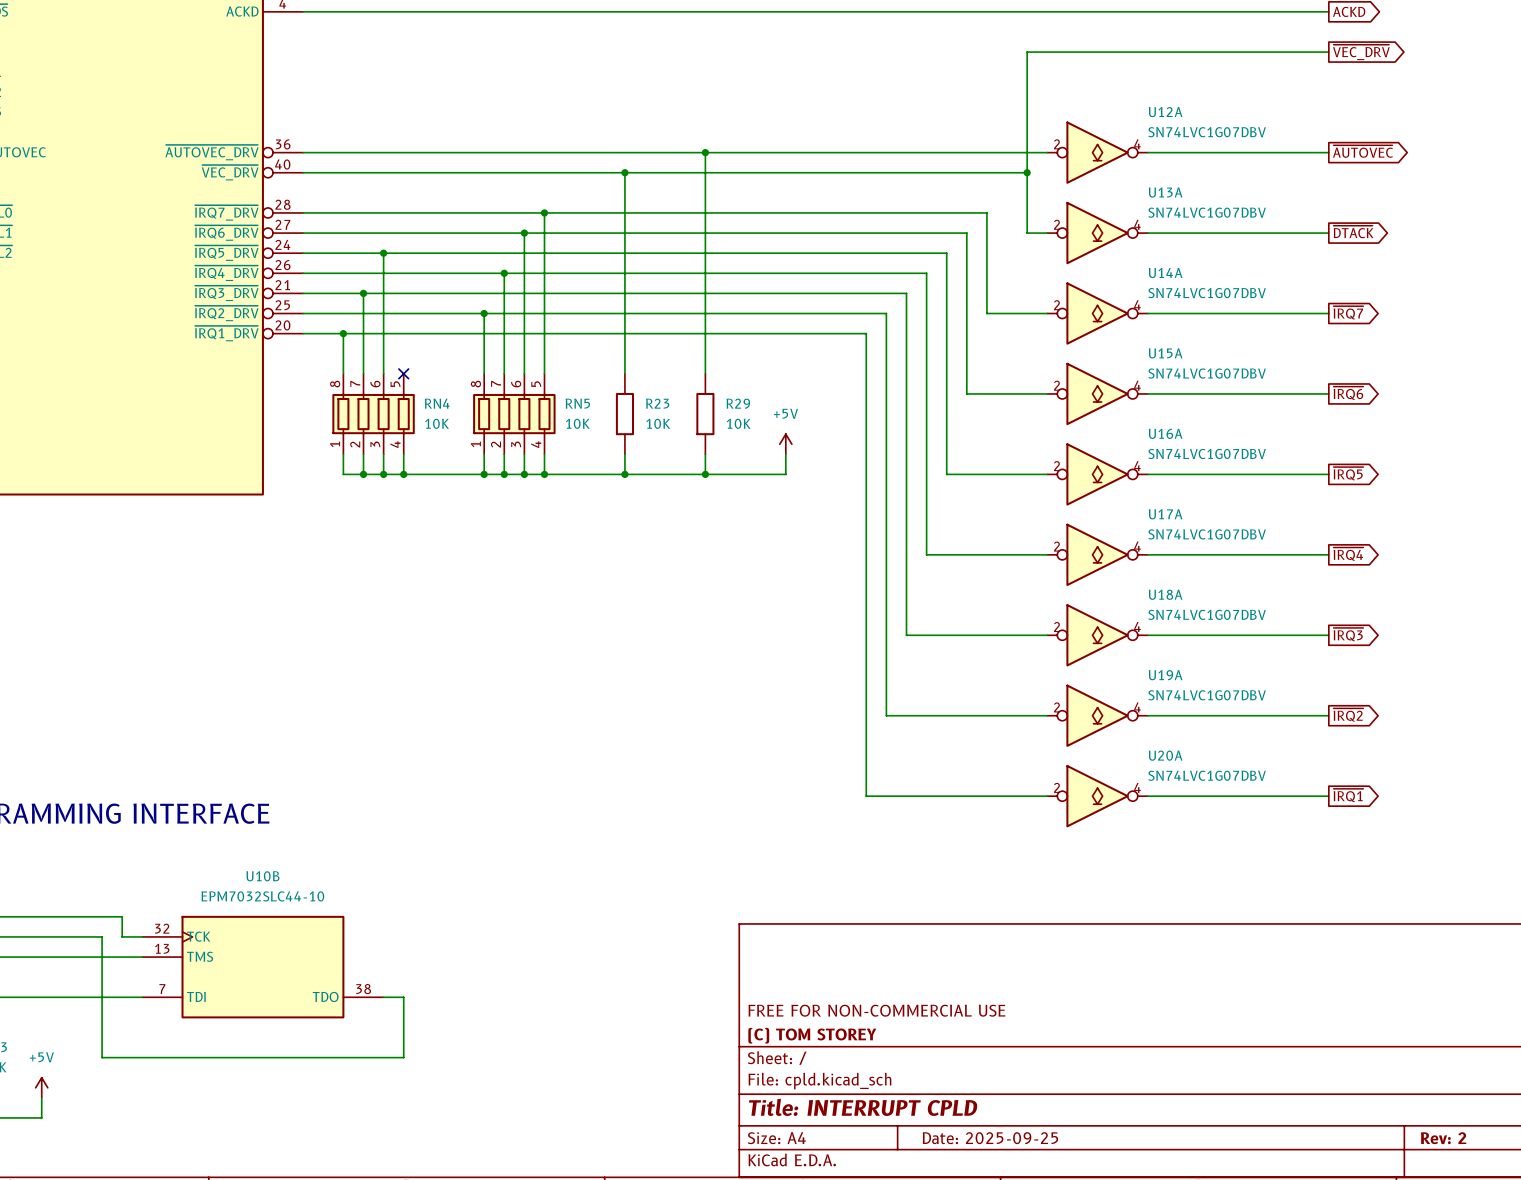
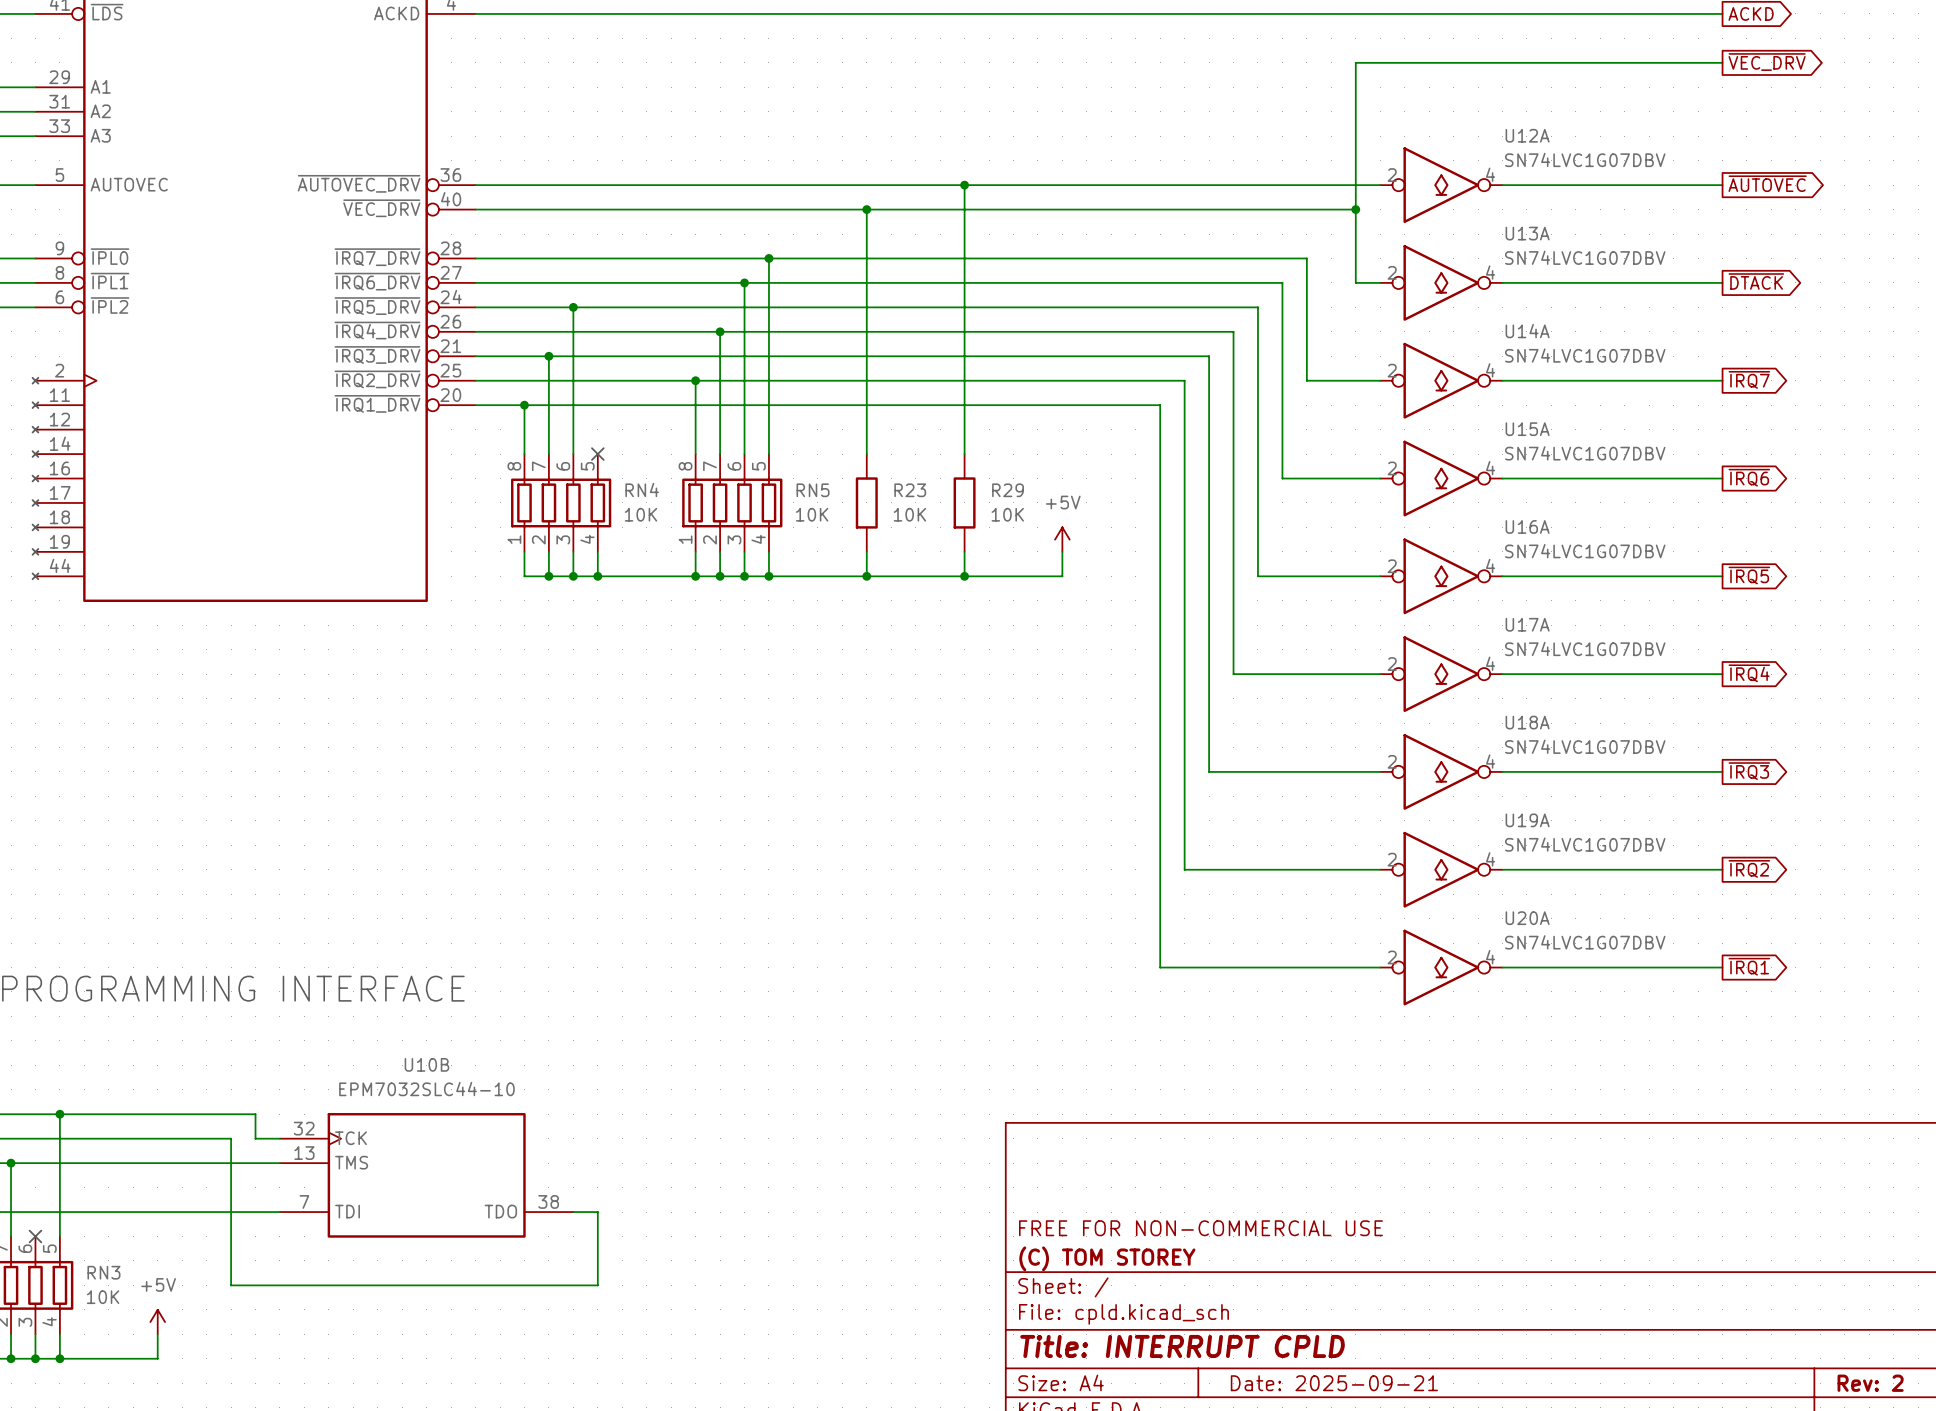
title block: Date: 2025-09-25 (990, 1138) -> Date: 2025-09-21 (1334, 1383)

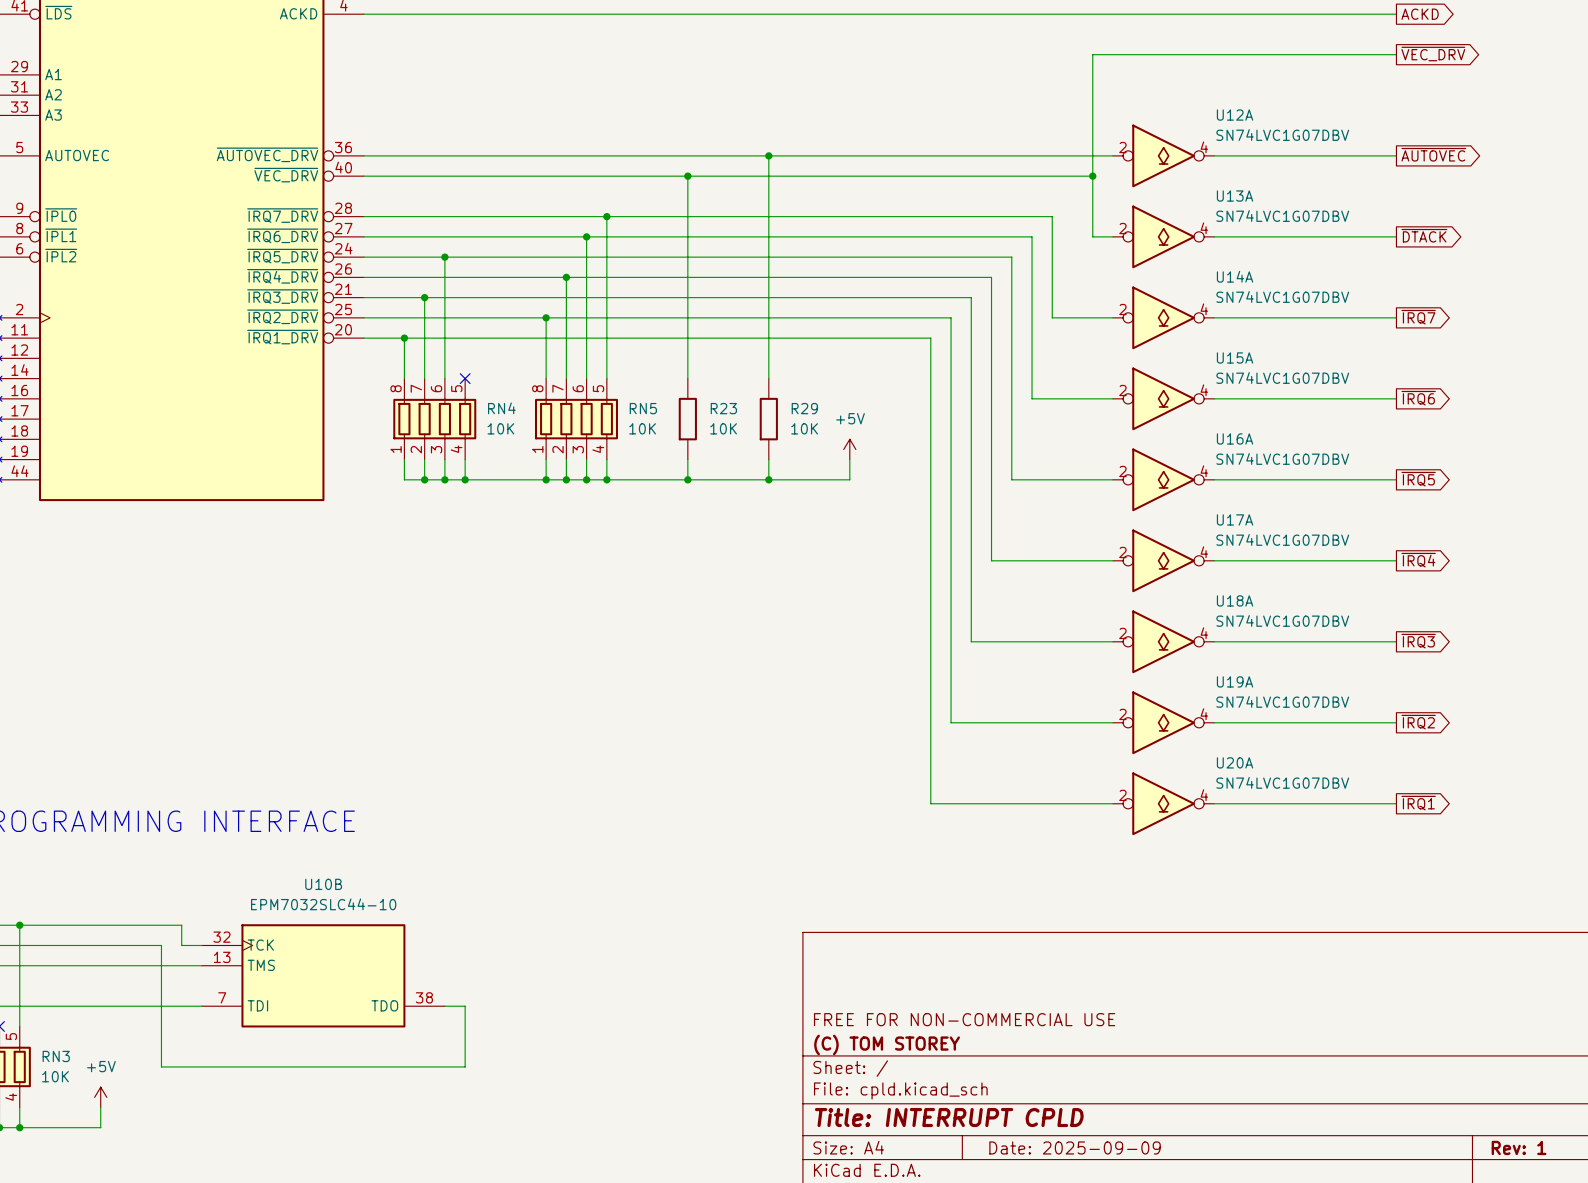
title block: Date: 2025-09-21 (1334, 1383) -> Date: 2025-09-09 (1075, 1147)
title block: Rev: 2 (1870, 1383) -> Rev: 1 (1519, 1147)

